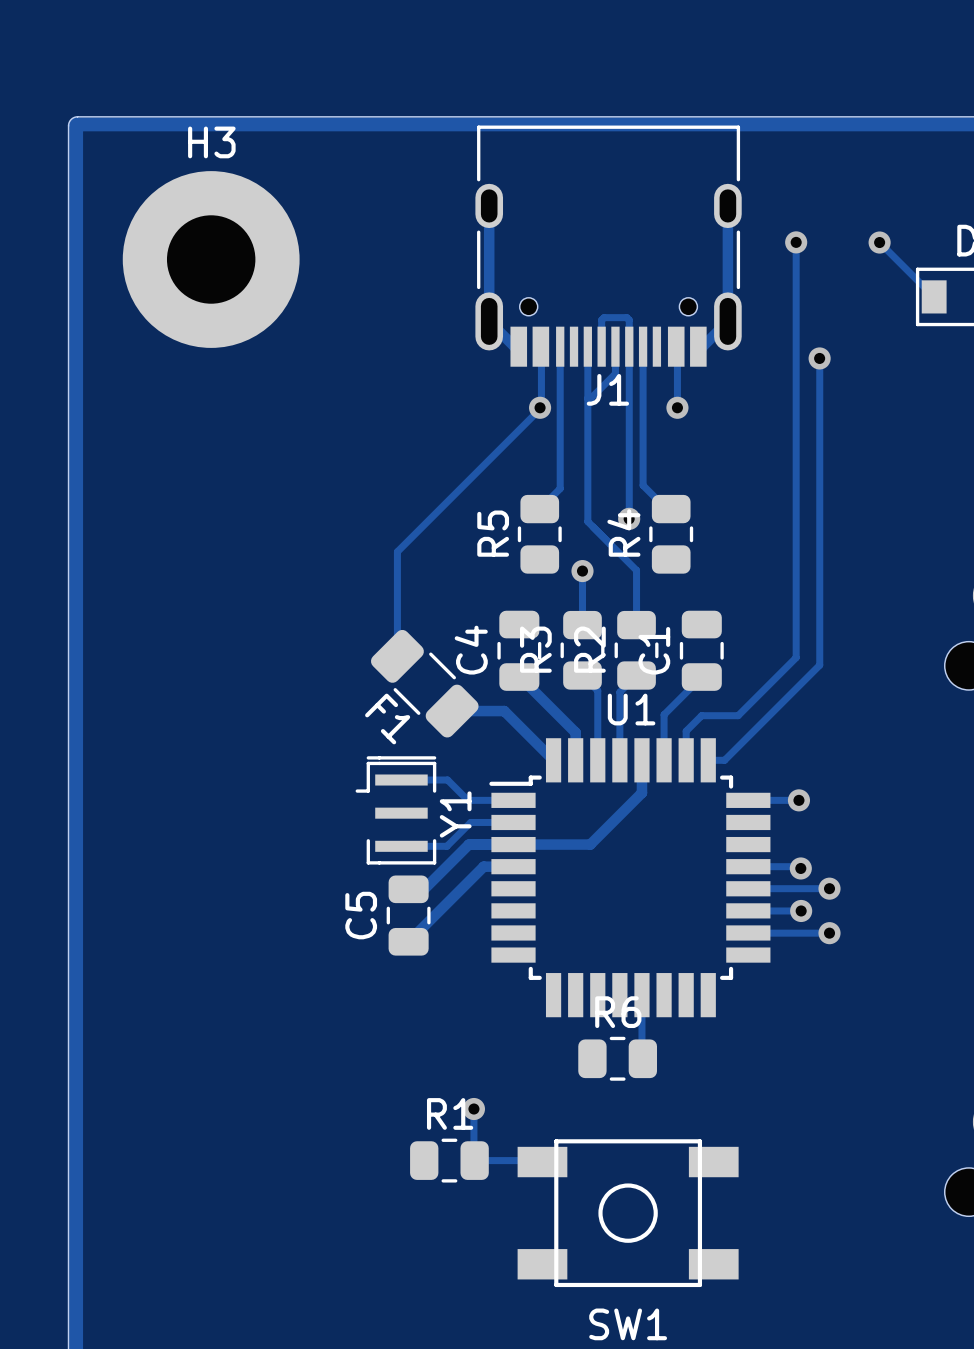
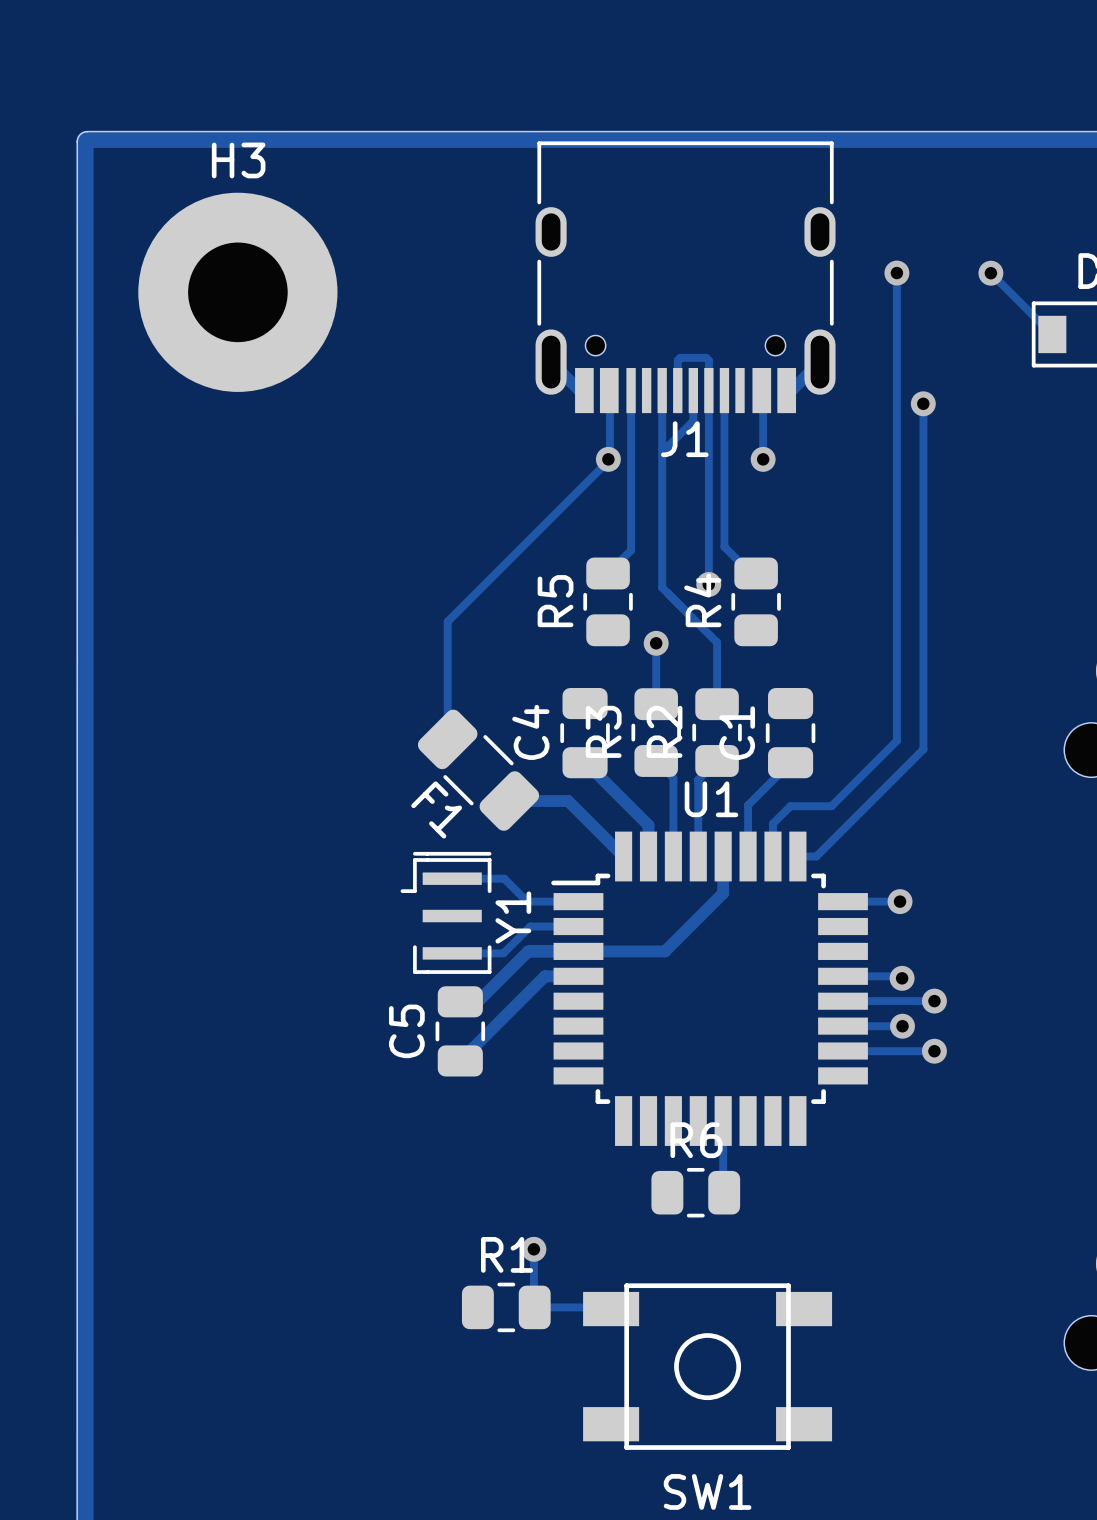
track: (489, 205) (489, 321) -> none
track: (727, 205) (727, 321) -> none

